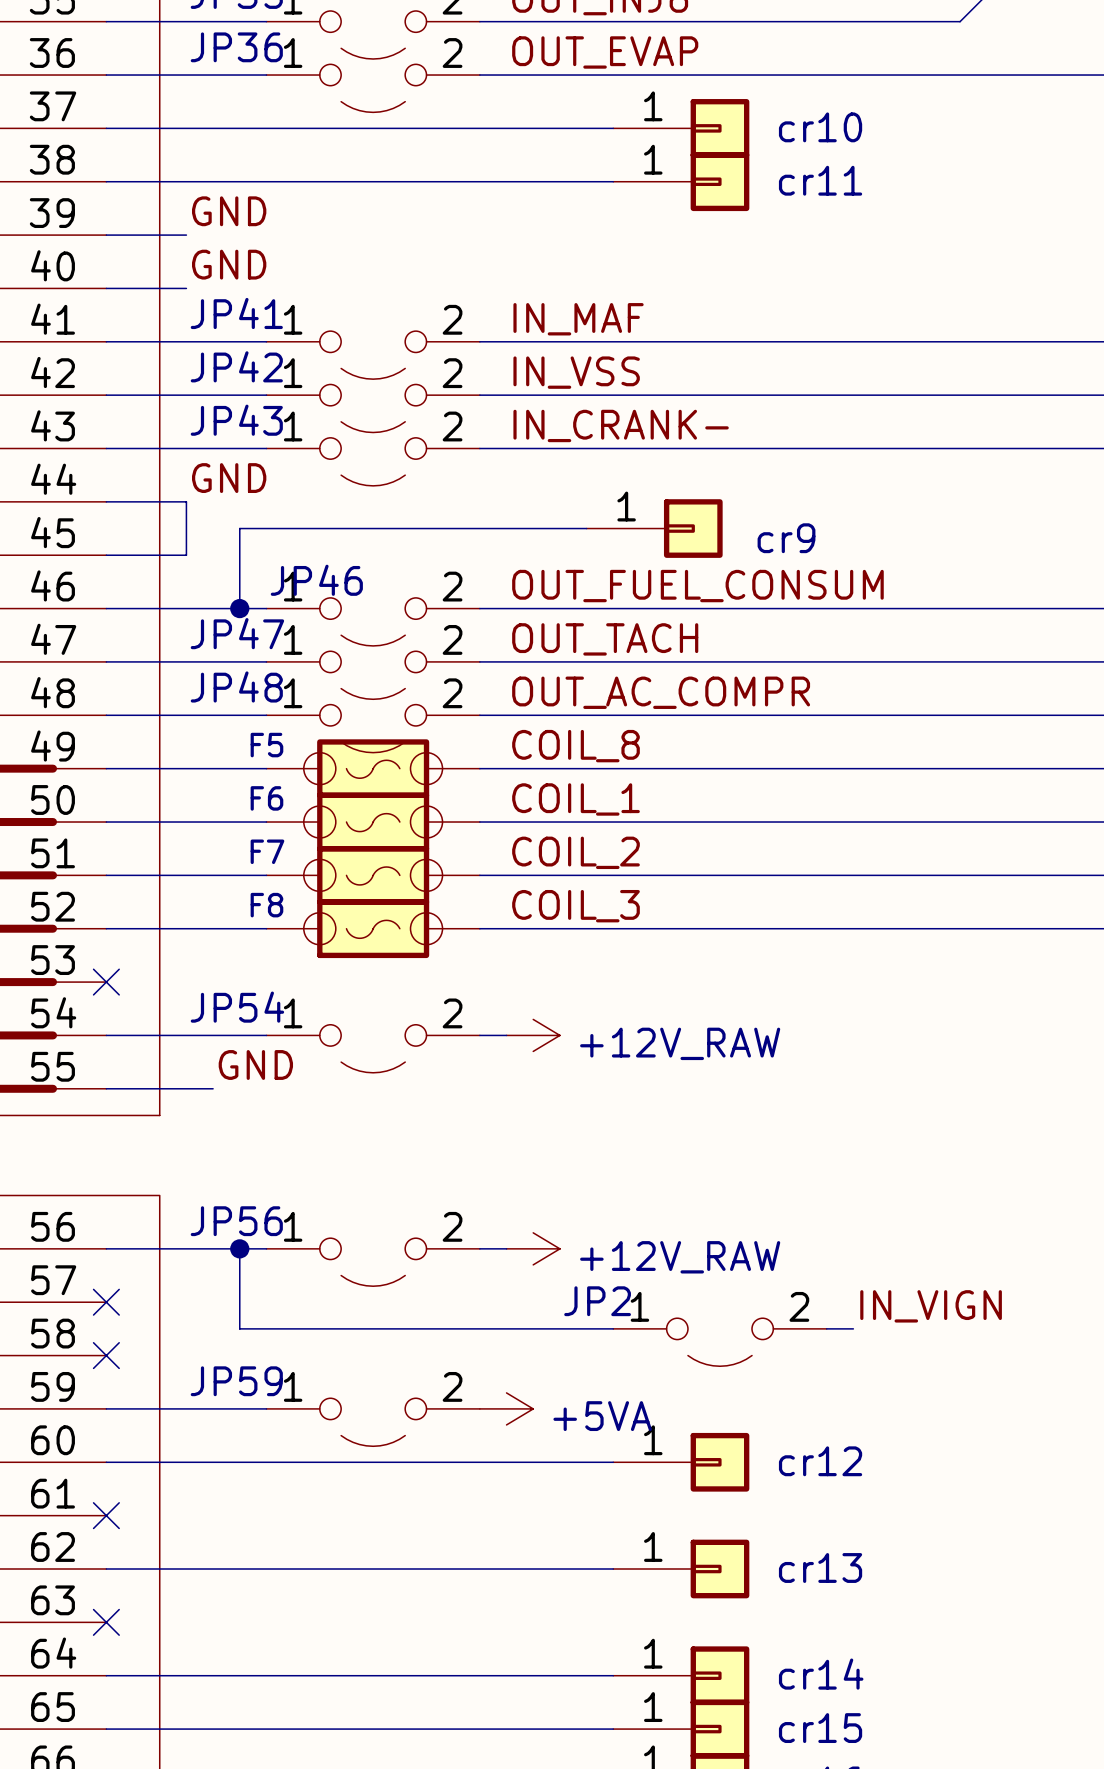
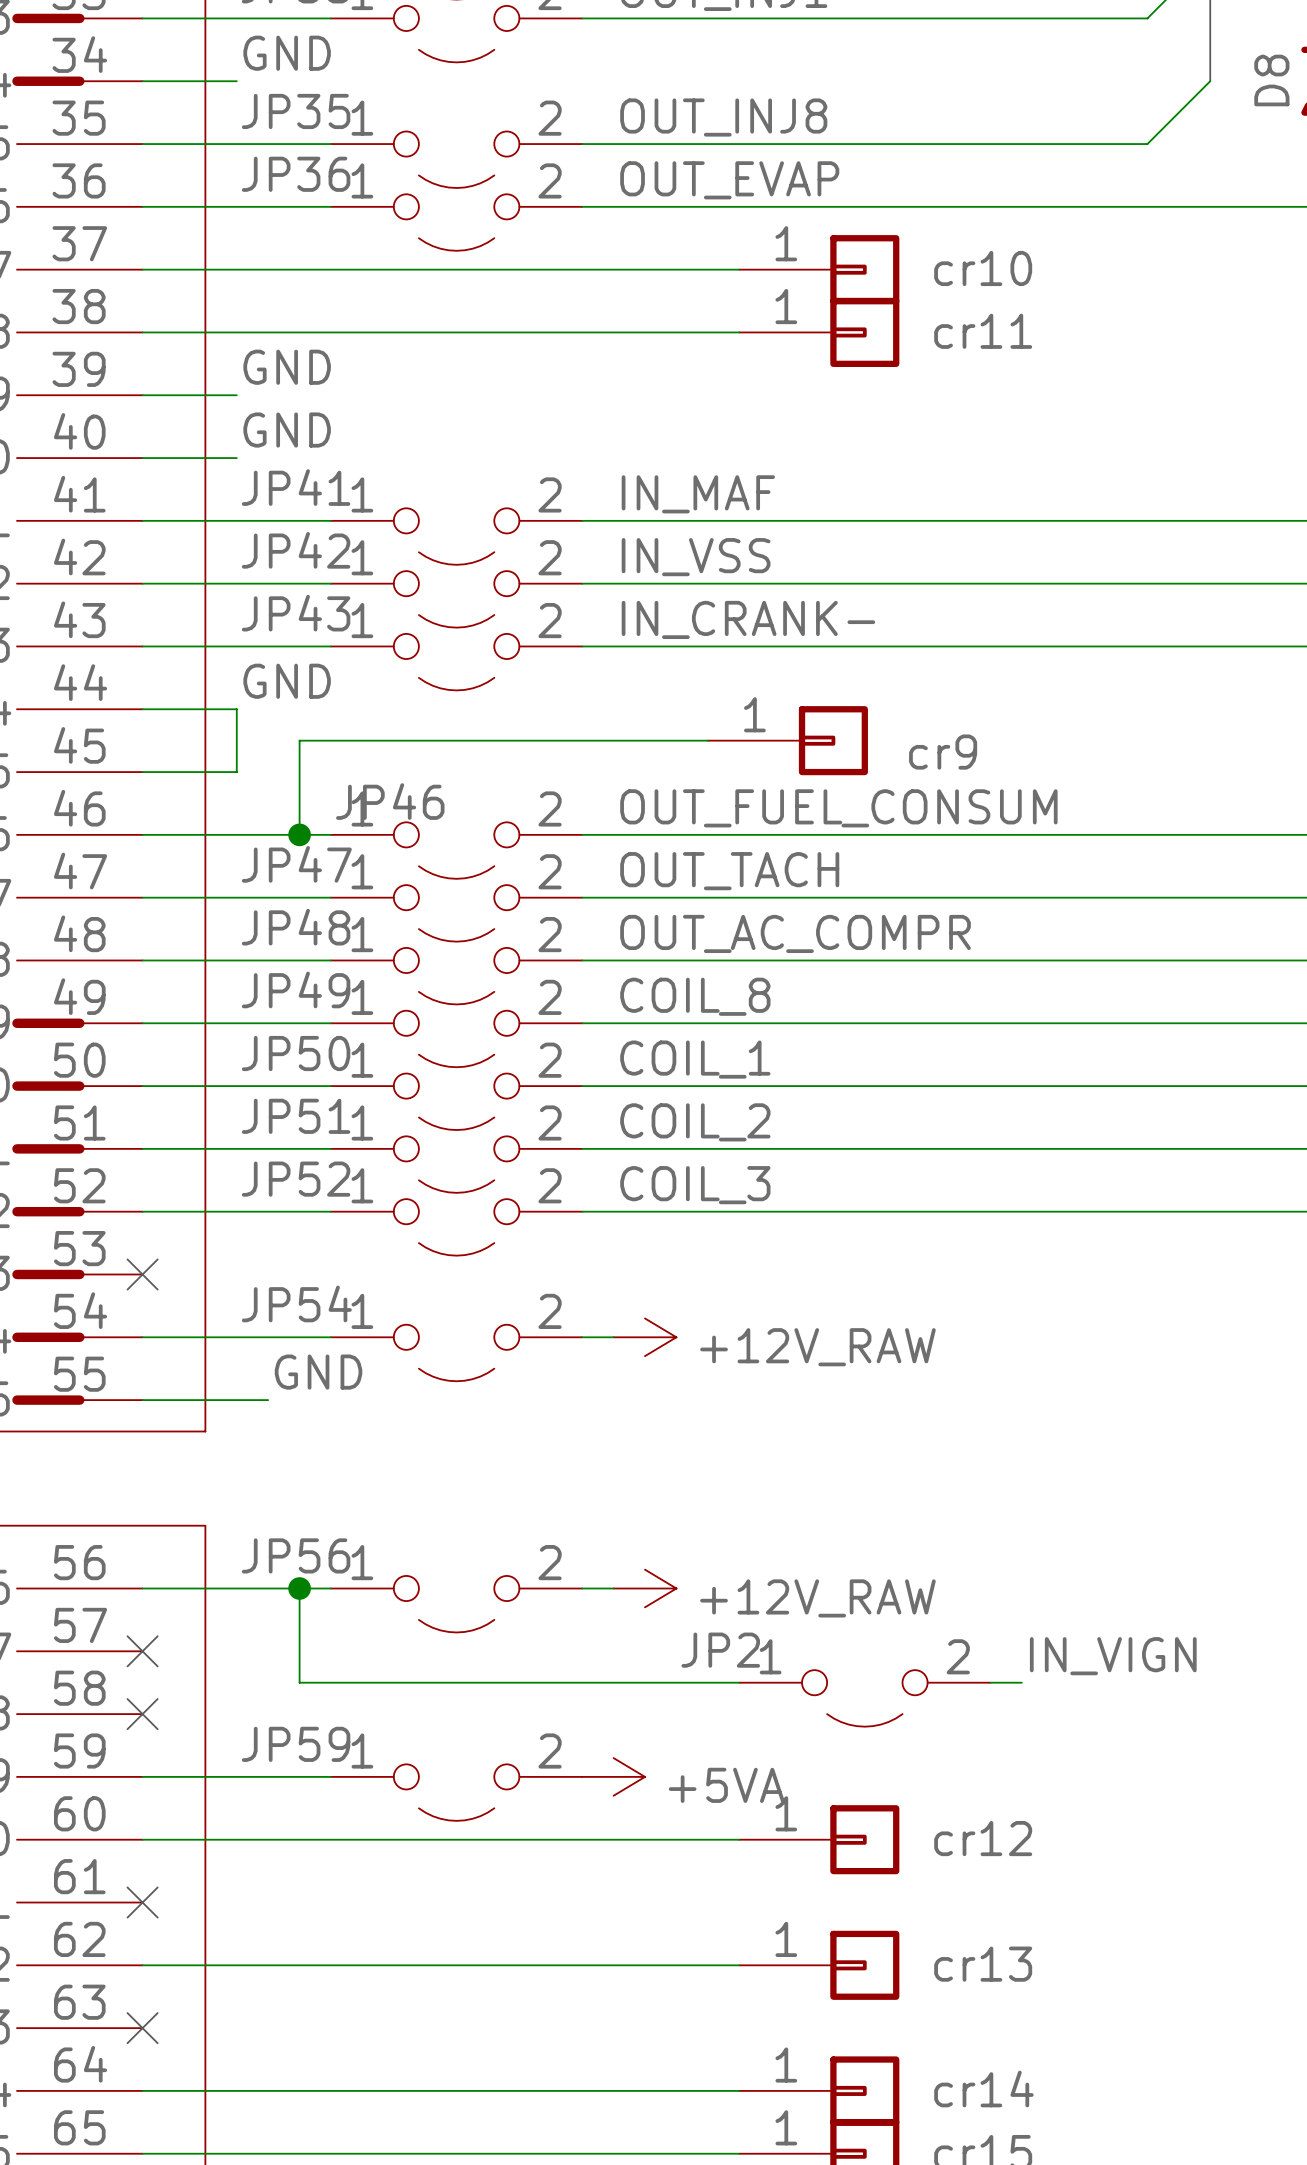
F5: (373, 768) -> none
JP49: none -> (456, 1038)
F6: (373, 822) -> none
JP50: none -> (456, 1101)
F7: (373, 875) -> none
JP51: none -> (456, 1164)
F8: (373, 928) -> none
JP52: none -> (456, 1227)

